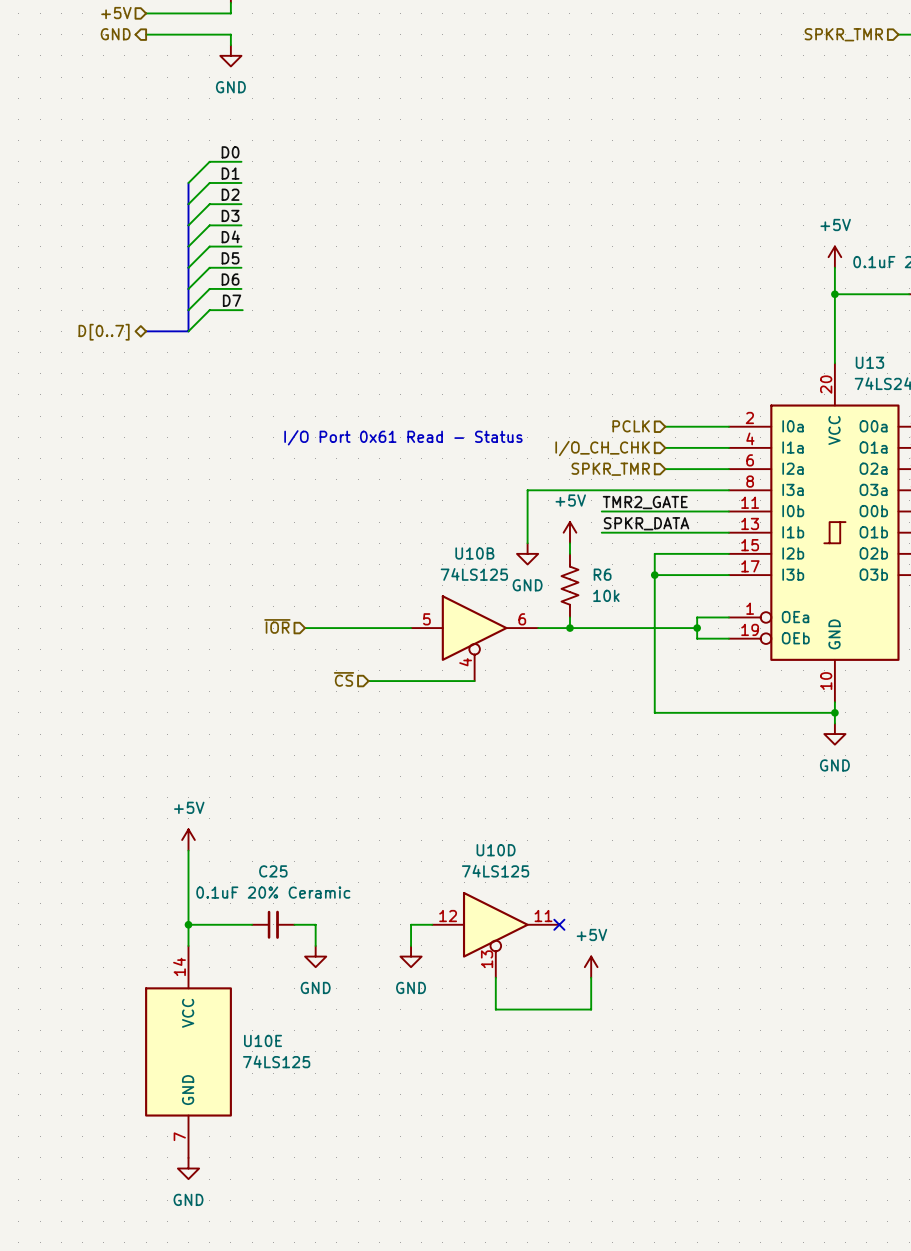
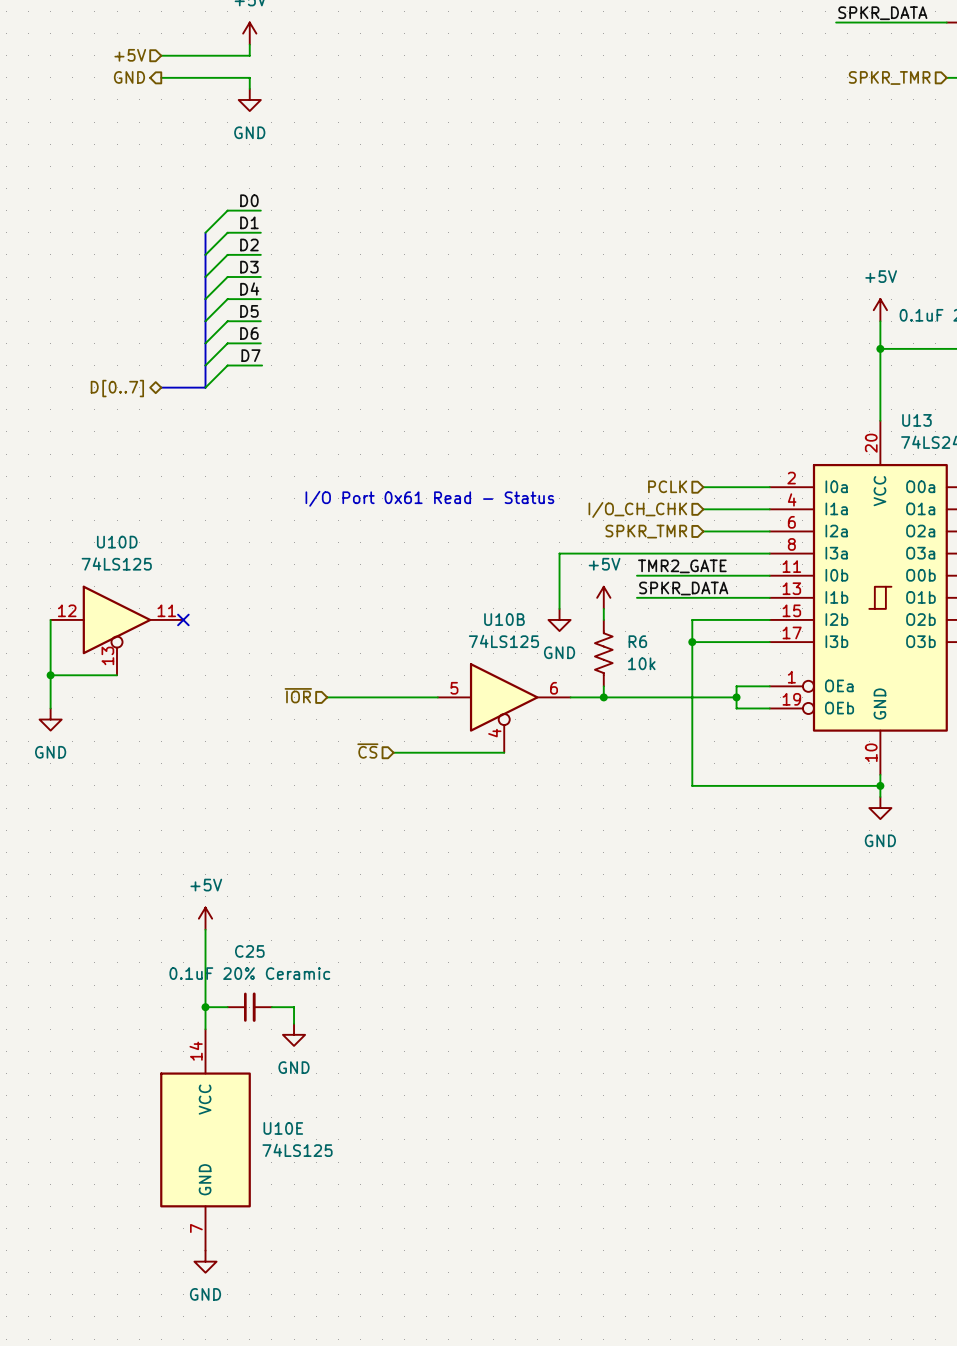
wire: none -> (50, 619) (50, 708)
no-connect mark: none -> (183, 619)
wire: none -> (50, 675) (117, 675)
junction: none -> (50, 675)
power symbol: none -> GND (50, 719)
C25 position: (273, 924) -> (249, 1007)
wire: (294, 924) (315, 924) (315, 945) -> none
wire: (432, 924) (411, 924) (411, 945) -> none
no-connect mark: (559, 924) -> none
U10D position: (495, 934) -> (117, 630)
power symbol position: GND (315, 956) -> GND (294, 1034)
power symbol: GND (411, 956) -> none
power symbol: +5V (591, 967) -> none
wire: (495, 977) (495, 1009) (591, 1009) (591, 977) -> none

